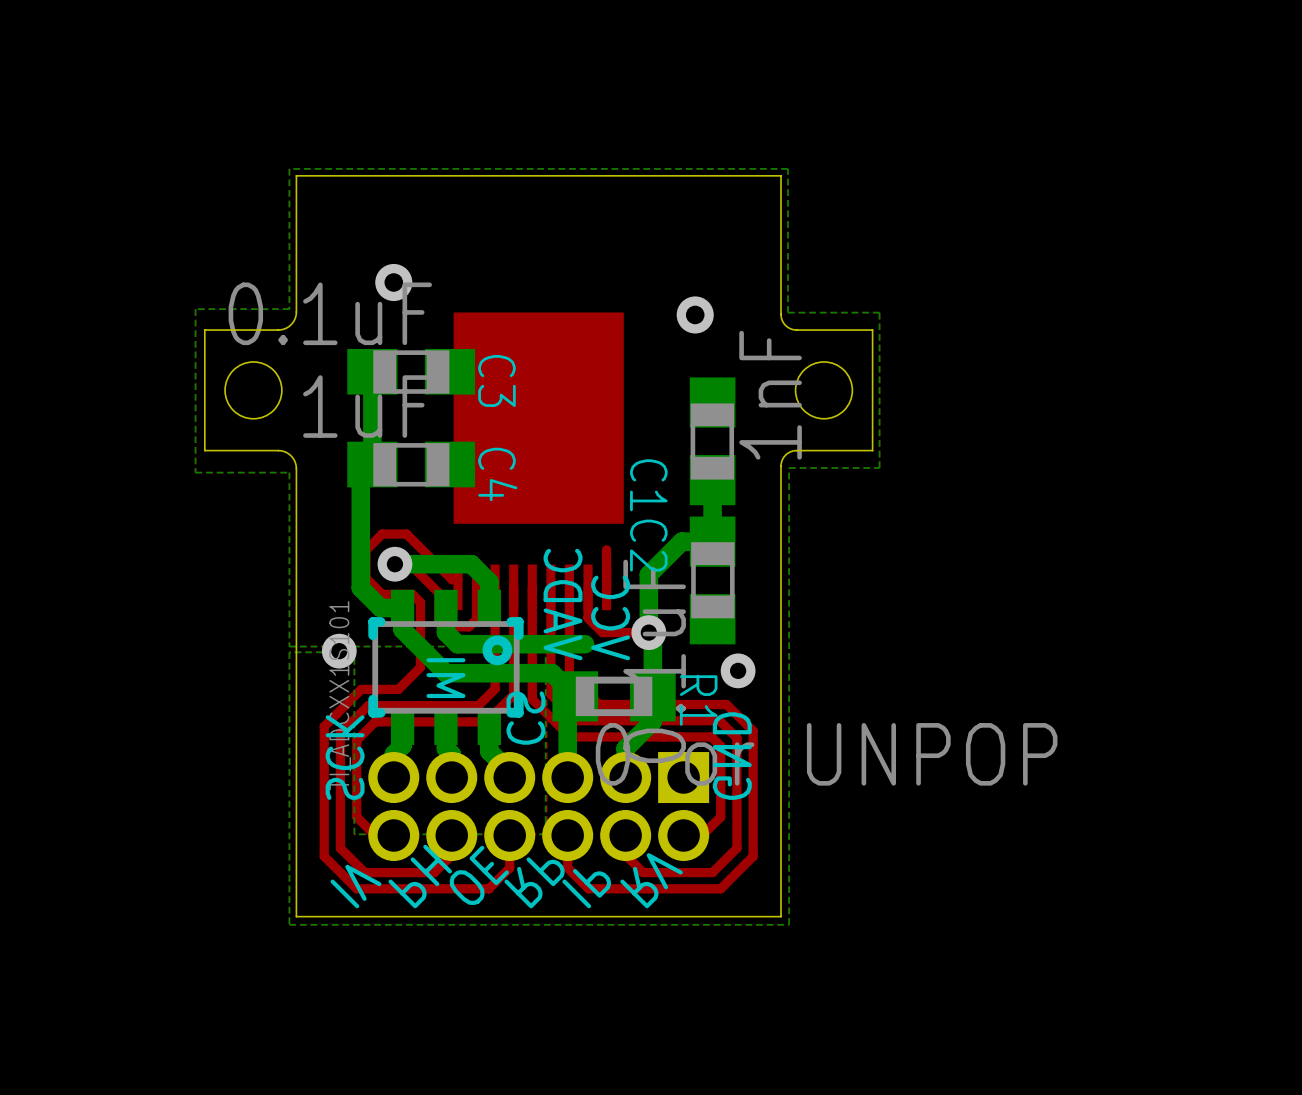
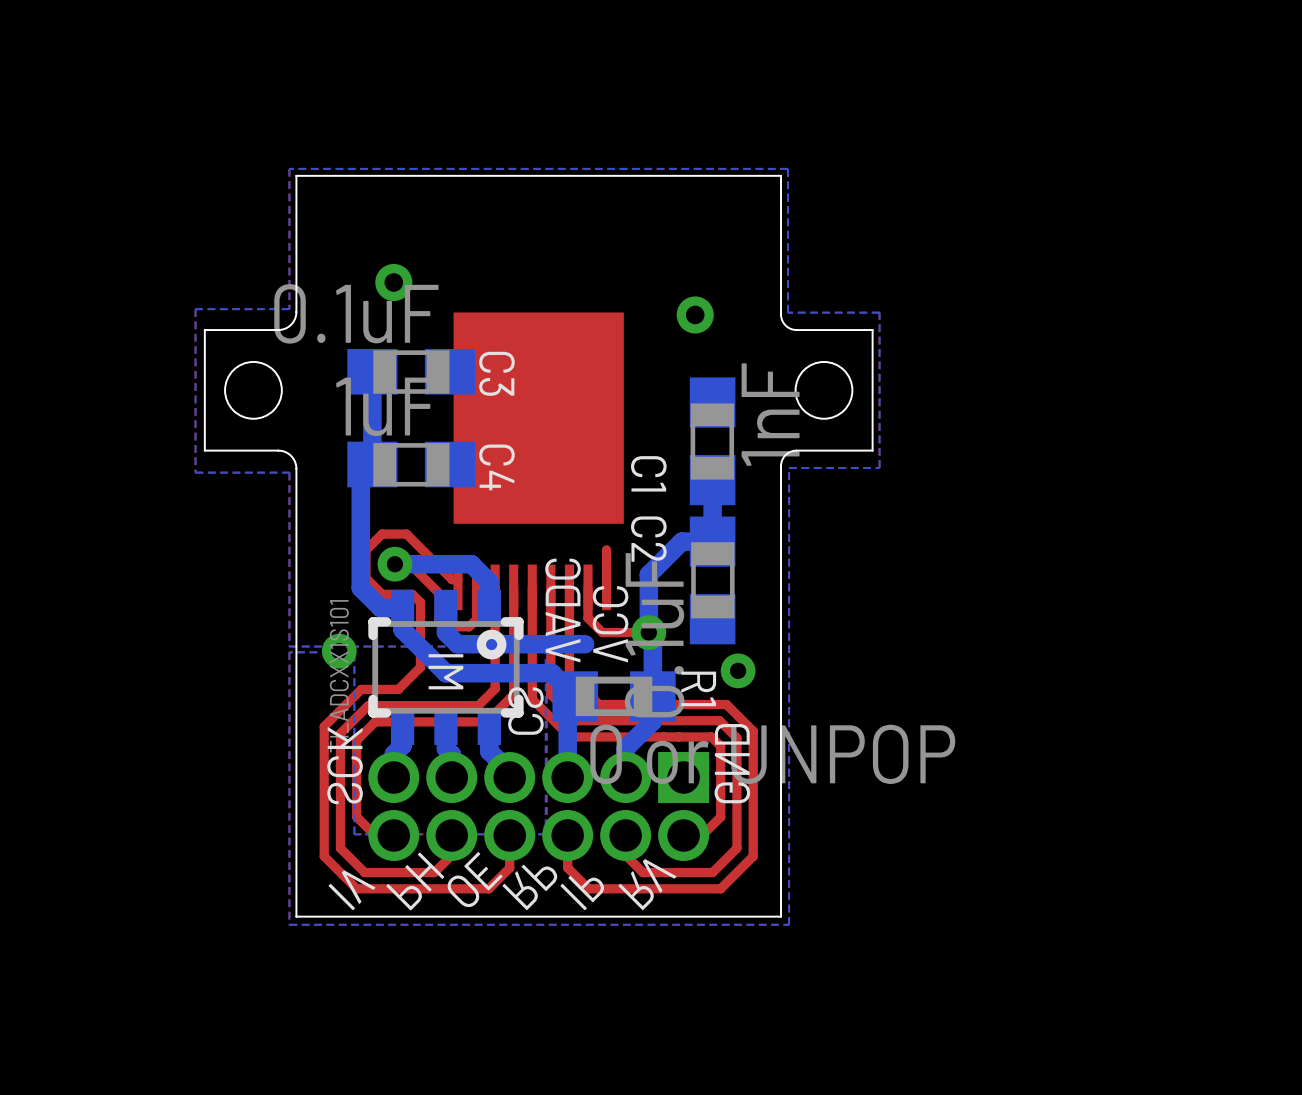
part footprint: [368, 589, 539, 745] -> [368, 589, 524, 745]

